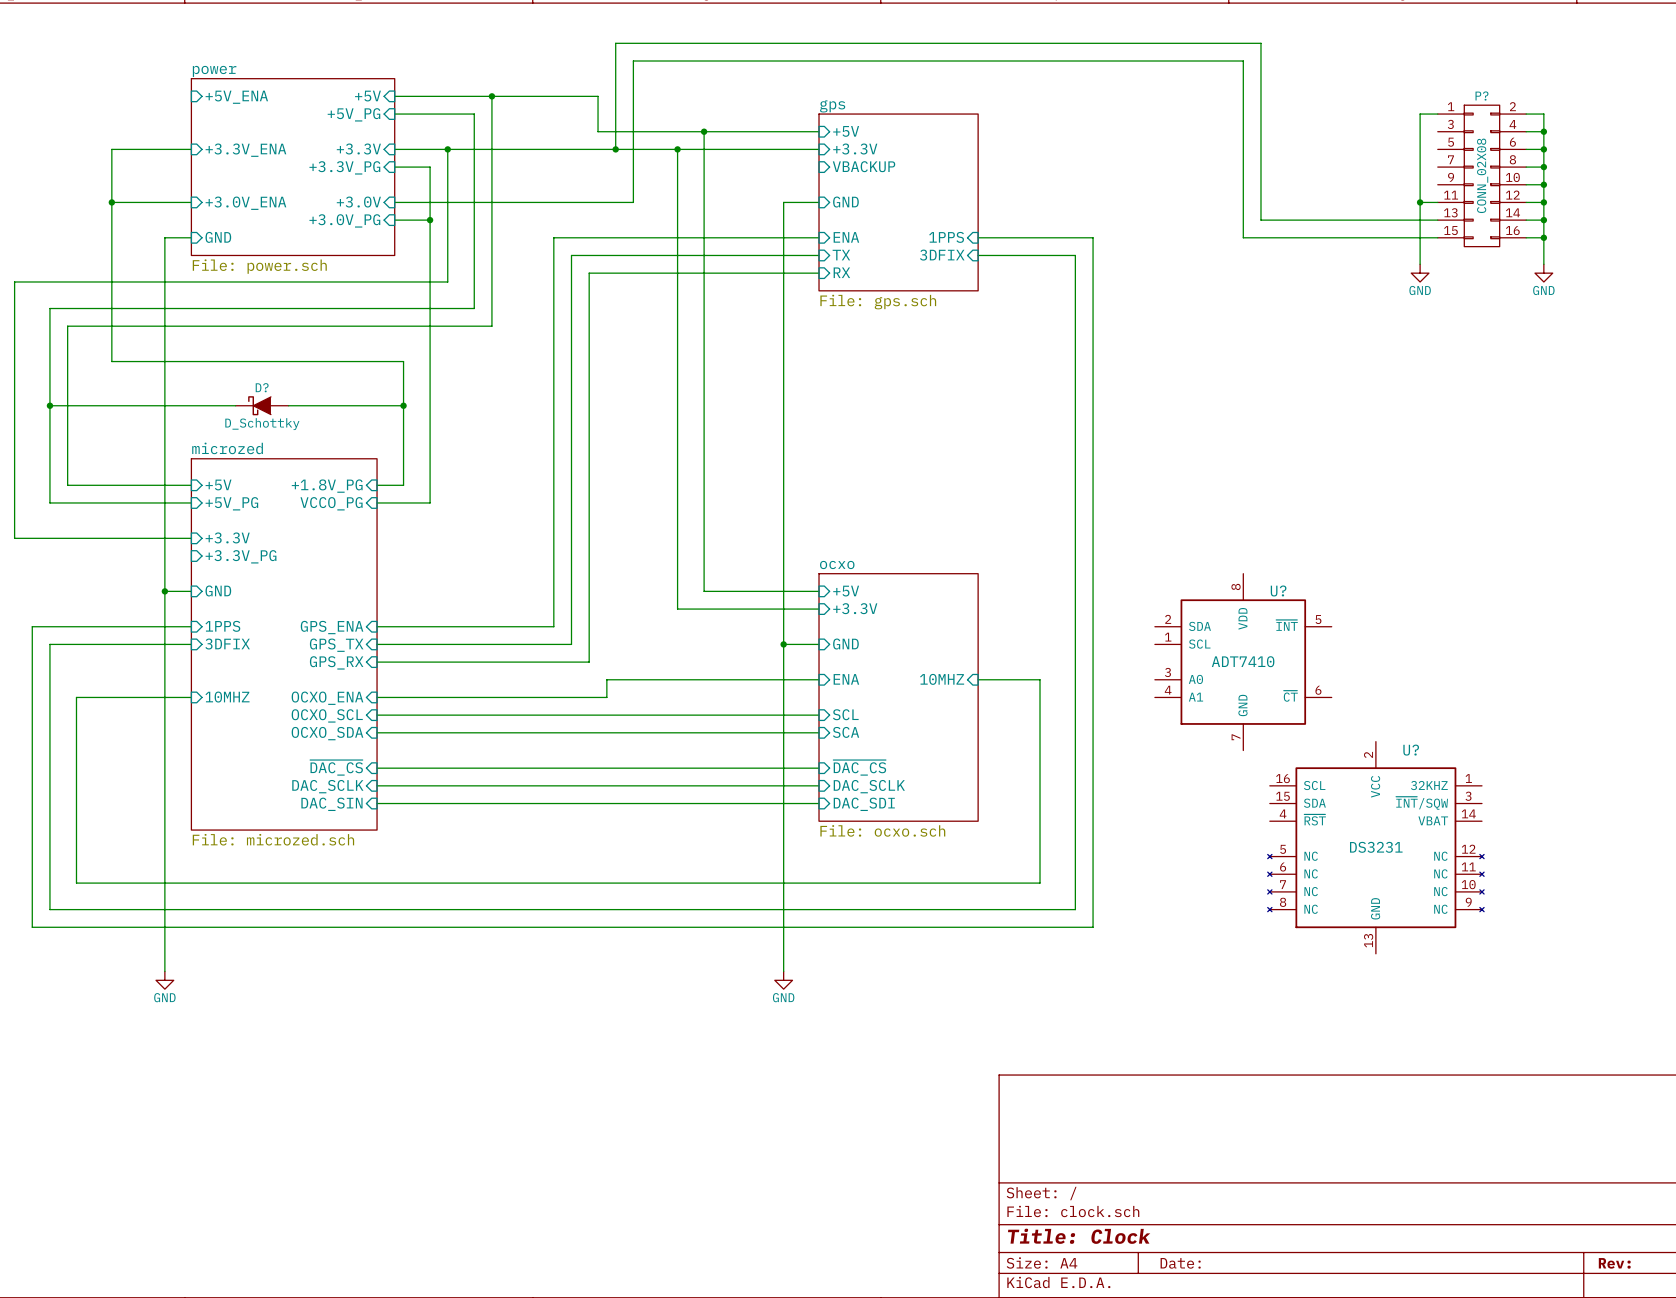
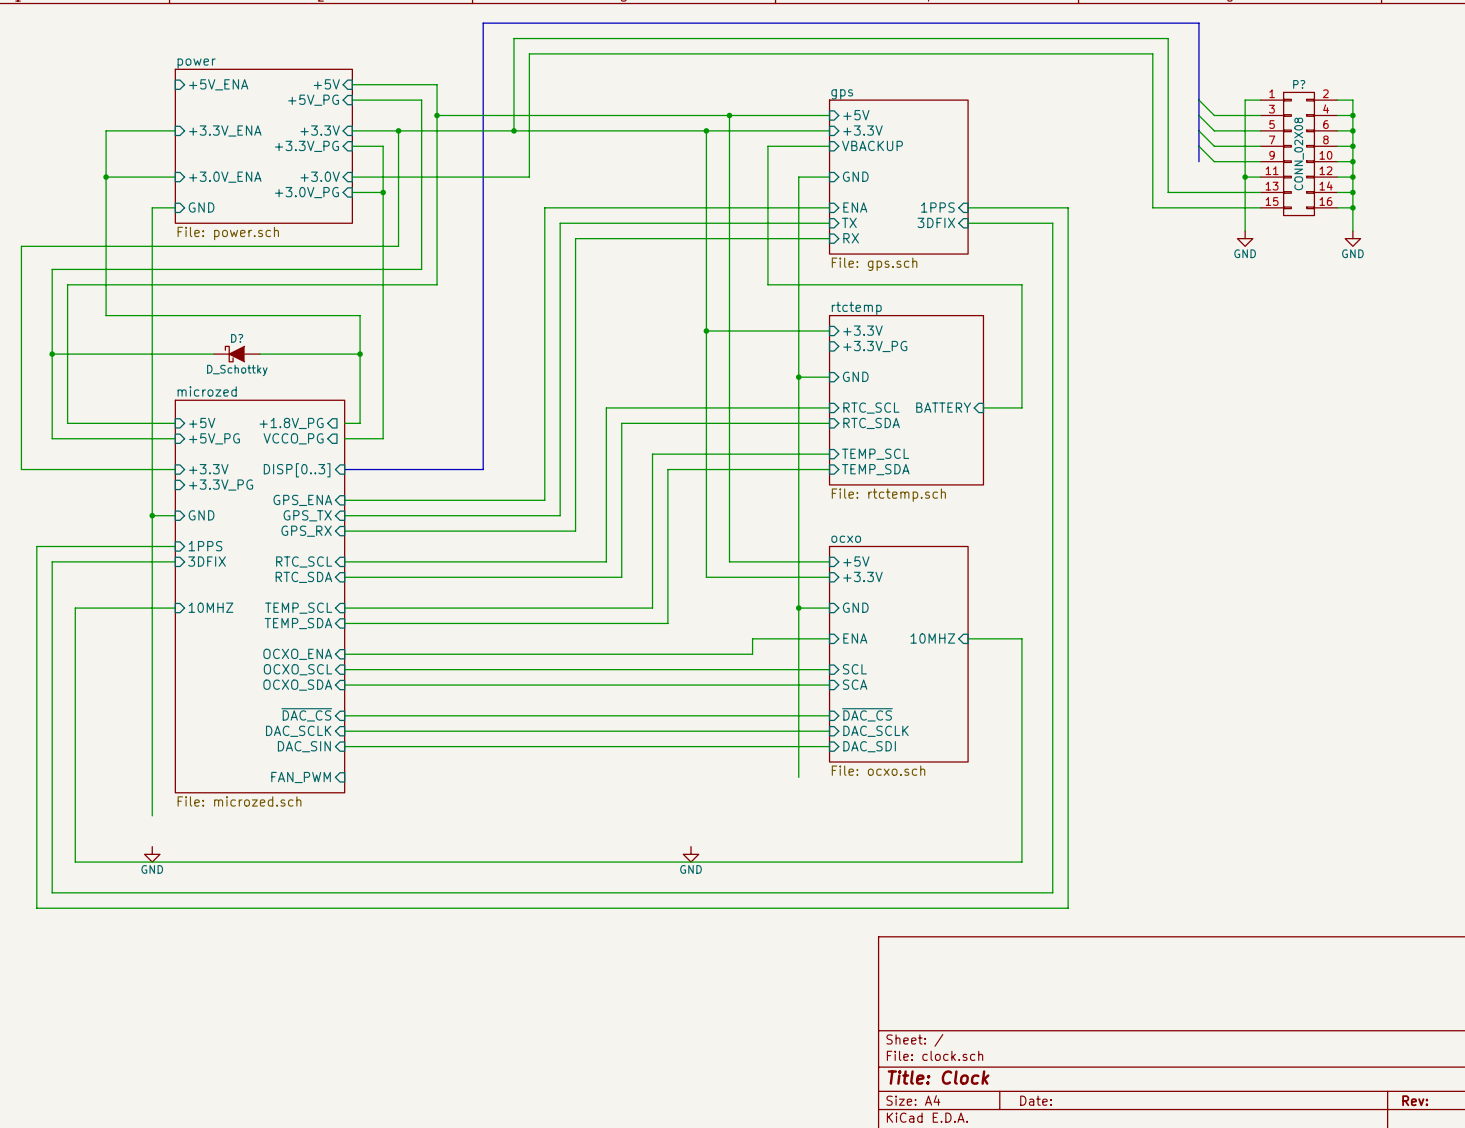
wire: (615, 43) (615, 149) -> (544, 38) (513, 38) (513, 130)
wire: (1260, 43) (1260, 220) (1331, 220) -> (1106, 38) (1168, 38) (1168, 192)
wire: (633, 61) (633, 202) (598, 202) -> (560, 53) (529, 53) (529, 84)
wire: (1243, 61) (1243, 237) (1314, 237) -> (1091, 53) (1152, 53) (1152, 207)
wire: (491, 96) (598, 96) -> none
junction position: (491, 96) -> (437, 115)
wire: none -> (1198, 100) (1214, 115) (1260, 115)
wire: none -> (437, 115) (529, 115) (529, 177)
wire: (704, 131) (704, 485) -> (829, 423) (621, 423)
junction: (704, 131) -> none
wire: none -> (721, 115) (829, 115)
wire: none -> (729, 115) (729, 561) (829, 561)
junction: none -> (729, 115)
sheet pin position: +5V (846, 131) -> +5V (856, 115)
wire: none -> (1198, 115) (1214, 130) (1260, 130)
junction position: (615, 149) -> (513, 130)
wire: (677, 149) (677, 609) (819, 609) -> none
junction: (677, 149) -> none
wire: none -> (706, 130) (706, 577) (829, 577)
junction: none -> (706, 130)
wire: none -> (721, 130) (829, 130)
sheet pin position: +3.3V (855, 149) -> +3.3V (863, 130)
wire: none -> (1198, 130) (1214, 146) (1260, 146)
sheet pin position: VBACKUP (864, 166) -> VBACKUP (872, 145)
wire: none -> (829, 146) (767, 146) (767, 284) (1021, 284) (1021, 407) (983, 407)
wire: none -> (1198, 146) (1214, 161) (1260, 161)
bus: none -> (1198, 161) (1198, 23) (483, 23) (483, 469) (344, 469)
wire: (819, 202) (783, 202) (783, 971) -> none
sheet pin position: GND (845, 202) -> GND (855, 176)
sheet gps position: (898, 202) -> (898, 177)
wire: none -> (829, 177) (798, 177) (798, 777)
wire: (615, 237) (553, 237) (553, 626) (377, 626) -> (544, 207) (544, 500) (344, 500)
wire: none -> (721, 207) (829, 207)
sheet pin position: ENA (846, 237) -> ENA (855, 207)
sheet pin position: 1PPS (946, 237) -> 1PPS (937, 207)
wire: (978, 237) (1093, 237) (1093, 927) (32, 927) -> (968, 207) (1068, 207) (1068, 908) (36, 908) (36, 808)
wire: (633, 255) (571, 255) (571, 644) -> (560, 223) (560, 515) (344, 515)
wire: none -> (721, 223) (829, 223)
sheet pin position: TX (841, 255) -> TX (849, 222)
sheet pin position: 3DFIX (942, 255) -> 3DFIX (936, 222)
wire: (978, 255) (1075, 255) (1075, 909) (49, 909) -> (968, 223) (1052, 223) (1052, 892) (52, 892) (52, 792)
sheet pin position: RX (841, 272) -> RX (851, 238)
wire: (651, 273) (589, 273) (589, 662) -> (575, 238) (575, 531) (344, 531)
wire: none -> (721, 238) (829, 238)
sheet pin: none -> +3.3V (863, 330)
wire: none -> (706, 330) (829, 330)
junction: none -> (706, 330)
sheet pin: none -> +3.3V_PG (875, 346)
sheet pin: none -> GND (855, 376)
wire: none -> (798, 377) (829, 377)
junction: none -> (798, 377)
sheet rtctemp: none -> File: rtctemp.sch (906, 400)
wire: none -> (829, 407) (606, 407) (606, 561) (506, 561)
sheet pin: none -> BATTERY (943, 407)
sheet pin: none -> RTC_SCL (871, 408)
wire: (377, 485) (385, 485) -> none
sheet pin: none -> RTC_SDA (871, 423)
wire: (377, 502) (385, 502) -> none
sheet pin: none -> TEMP_SCL (875, 454)
sheet pin: none -> DISP[0..3] (297, 470)
sheet pin: none -> TEMP_SDA (875, 469)
wire: (704, 591) (819, 591) -> (621, 515) (621, 577) (521, 577)
sheet pin position: +5V (846, 591) -> +5V (856, 561)
sheet pin: +3.3V (855, 608) -> none
sheet pin position: GPS_ENA (332, 627) -> GPS_ENA (302, 500)
sheet microzed: File: microzed.sch (284, 644) -> none
wire: (377, 644) (385, 644) -> none
wire: (783, 644) (819, 644) -> (798, 608) (829, 608)
junction: (783, 644) -> none
sheet pin: GND (845, 644) -> none
sheet pin position: GPS_TX (336, 645) -> GPS_TX (307, 515)
sheet pin: none -> RTC_SCL (304, 561)
sheet pin: none -> +3.3V (863, 576)
sheet pin position: GPS_RX (336, 662) -> GPS_RX (306, 531)
sheet pin: none -> RTC_SDA (303, 577)
wire: (377, 662) (385, 662) -> none
U?: ADT7410 (1243, 662) -> none
wire: (819, 679) (606, 679) (606, 697) -> (829, 454) (652, 454) (652, 608) (537, 608)
sheet pin position: ENA (846, 679) -> ENA (855, 638)
sheet pin position: 10MHZ (942, 679) -> 10MHZ (932, 638)
wire: (978, 679) (1040, 679) (1040, 883) (76, 883) -> (968, 638) (1021, 638) (1021, 862) (75, 862) (75, 769)
sheet microzed: none -> File: microzed.sch (260, 596)
wire: (377, 697) (385, 697) -> none
sheet ocxo position: (898, 697) -> (898, 654)
junction: none -> (798, 608)
sheet pin: none -> GND (855, 607)
sheet pin position: OCXO_ENA (327, 698) -> OCXO_ENA (297, 654)
sheet pin: none -> TEMP_SCL (298, 608)
sheet pin position: SCL (845, 714) -> SCL (854, 669)
sheet pin position: OCXO_SCL (327, 715) -> OCXO_SCL (297, 669)
sheet pin: none -> TEMP_SDA (298, 623)
wire: (377, 715) (385, 715) -> none
wire: (757, 715) (819, 715) -> (667, 623) (667, 469) (829, 469)
wire: (377, 732) (819, 732) -> none
sheet pin position: SCA (846, 732) -> SCA (855, 684)
wire: none -> (829, 638) (752, 638) (752, 654) (344, 654)
sheet pin position: OCXO_SDA (327, 733) -> OCXO_SDA (297, 685)
sheet pin position: ~{DAC_CS} (336, 767) -> ~{DAC_CS} (306, 714)
sheet pin position: ~{DAC_CS} (859, 767) -> ~{DAC_CS} (867, 714)
wire: (377, 768) (385, 768) -> none
wire: none -> (721, 669) (829, 669)
wire: (377, 785) (385, 785) -> none
wire: none -> (721, 685) (829, 685)
sheet pin position: DAC_SCLK (327, 786) -> DAC_SCLK (298, 731)
sheet pin position: DAC_SCLK (869, 786) -> DAC_SCLK (875, 731)
wire: (377, 803) (819, 803) -> none
sheet pin position: DAC_SIN (331, 804) -> DAC_SIN (304, 746)
sheet pin position: DAC_SDI (864, 804) -> DAC_SDI (869, 746)
wire: none -> (344, 715) (829, 715)
wire: none -> (344, 731) (829, 731)
U?: DS3231 (1375, 847) -> none
wire: none -> (344, 746) (829, 746)
sheet pin: none -> FAN_PWM (301, 777)
wire: (164, 936) (164, 971) -> none

